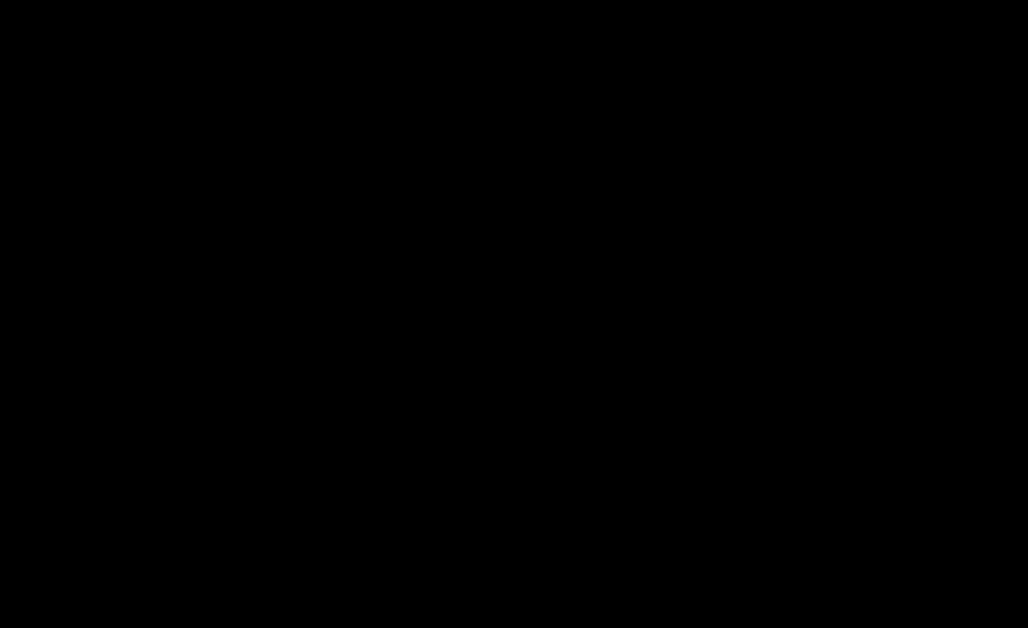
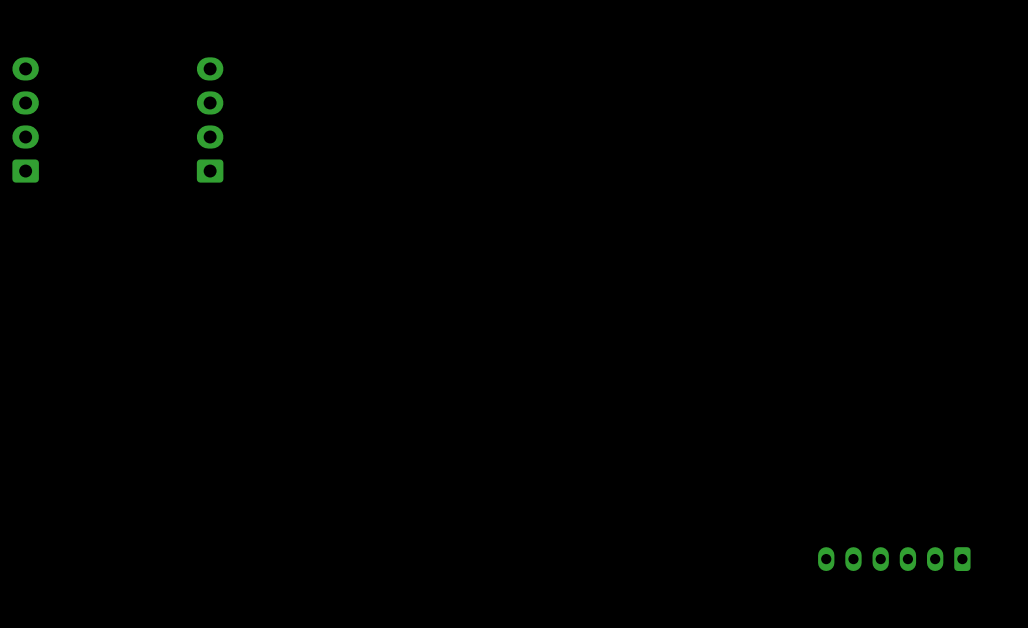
part: none -> (25, 119)
part: none -> (210, 119)
part: none -> (894, 559)

